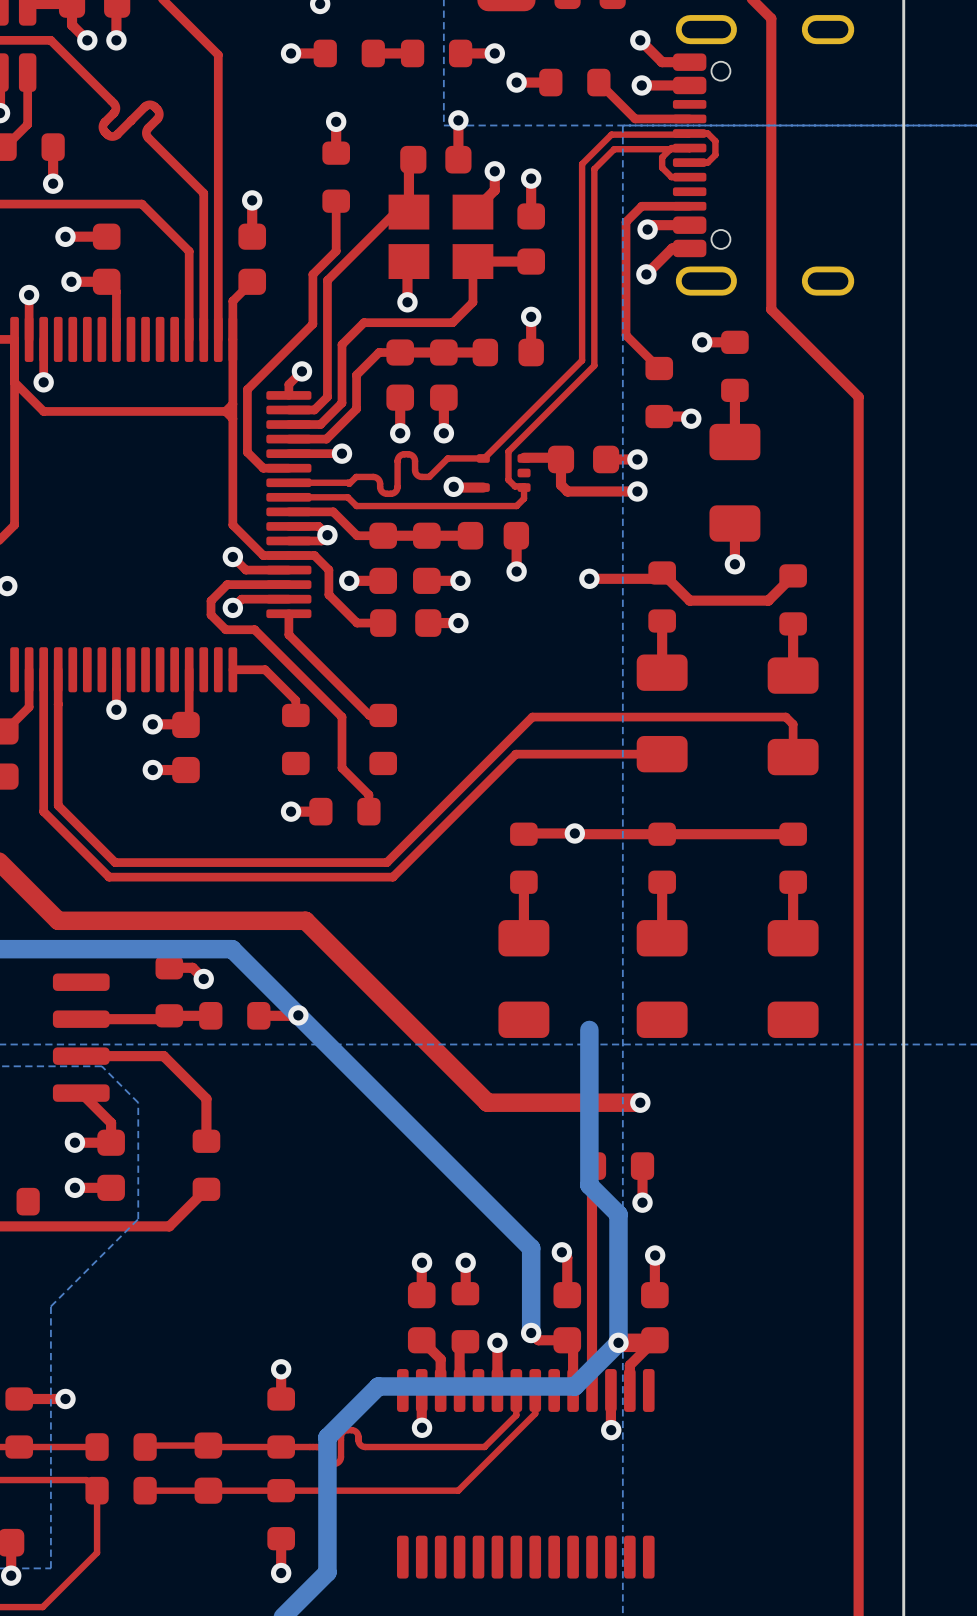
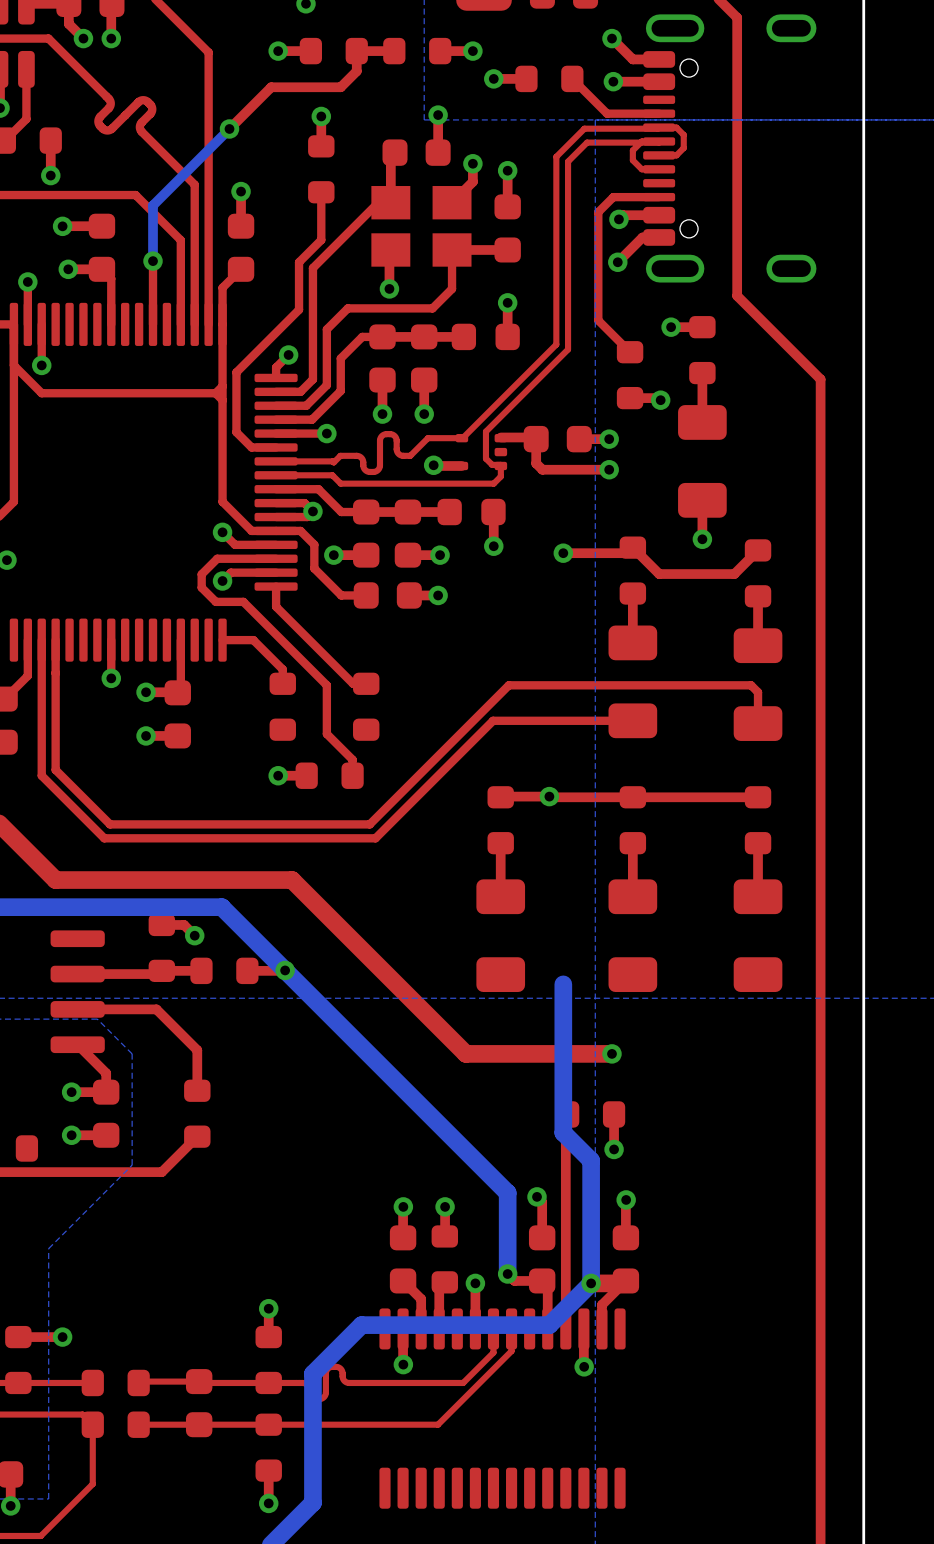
top track: none -> (356, 51) (356, 71) (340, 87) (271, 87) (229, 128)
bottom track: none -> (229, 128) (153, 205) (153, 261)
via: none -> (229, 128)
top track: none -> (153, 261) (153, 324)
via: none -> (153, 261)

